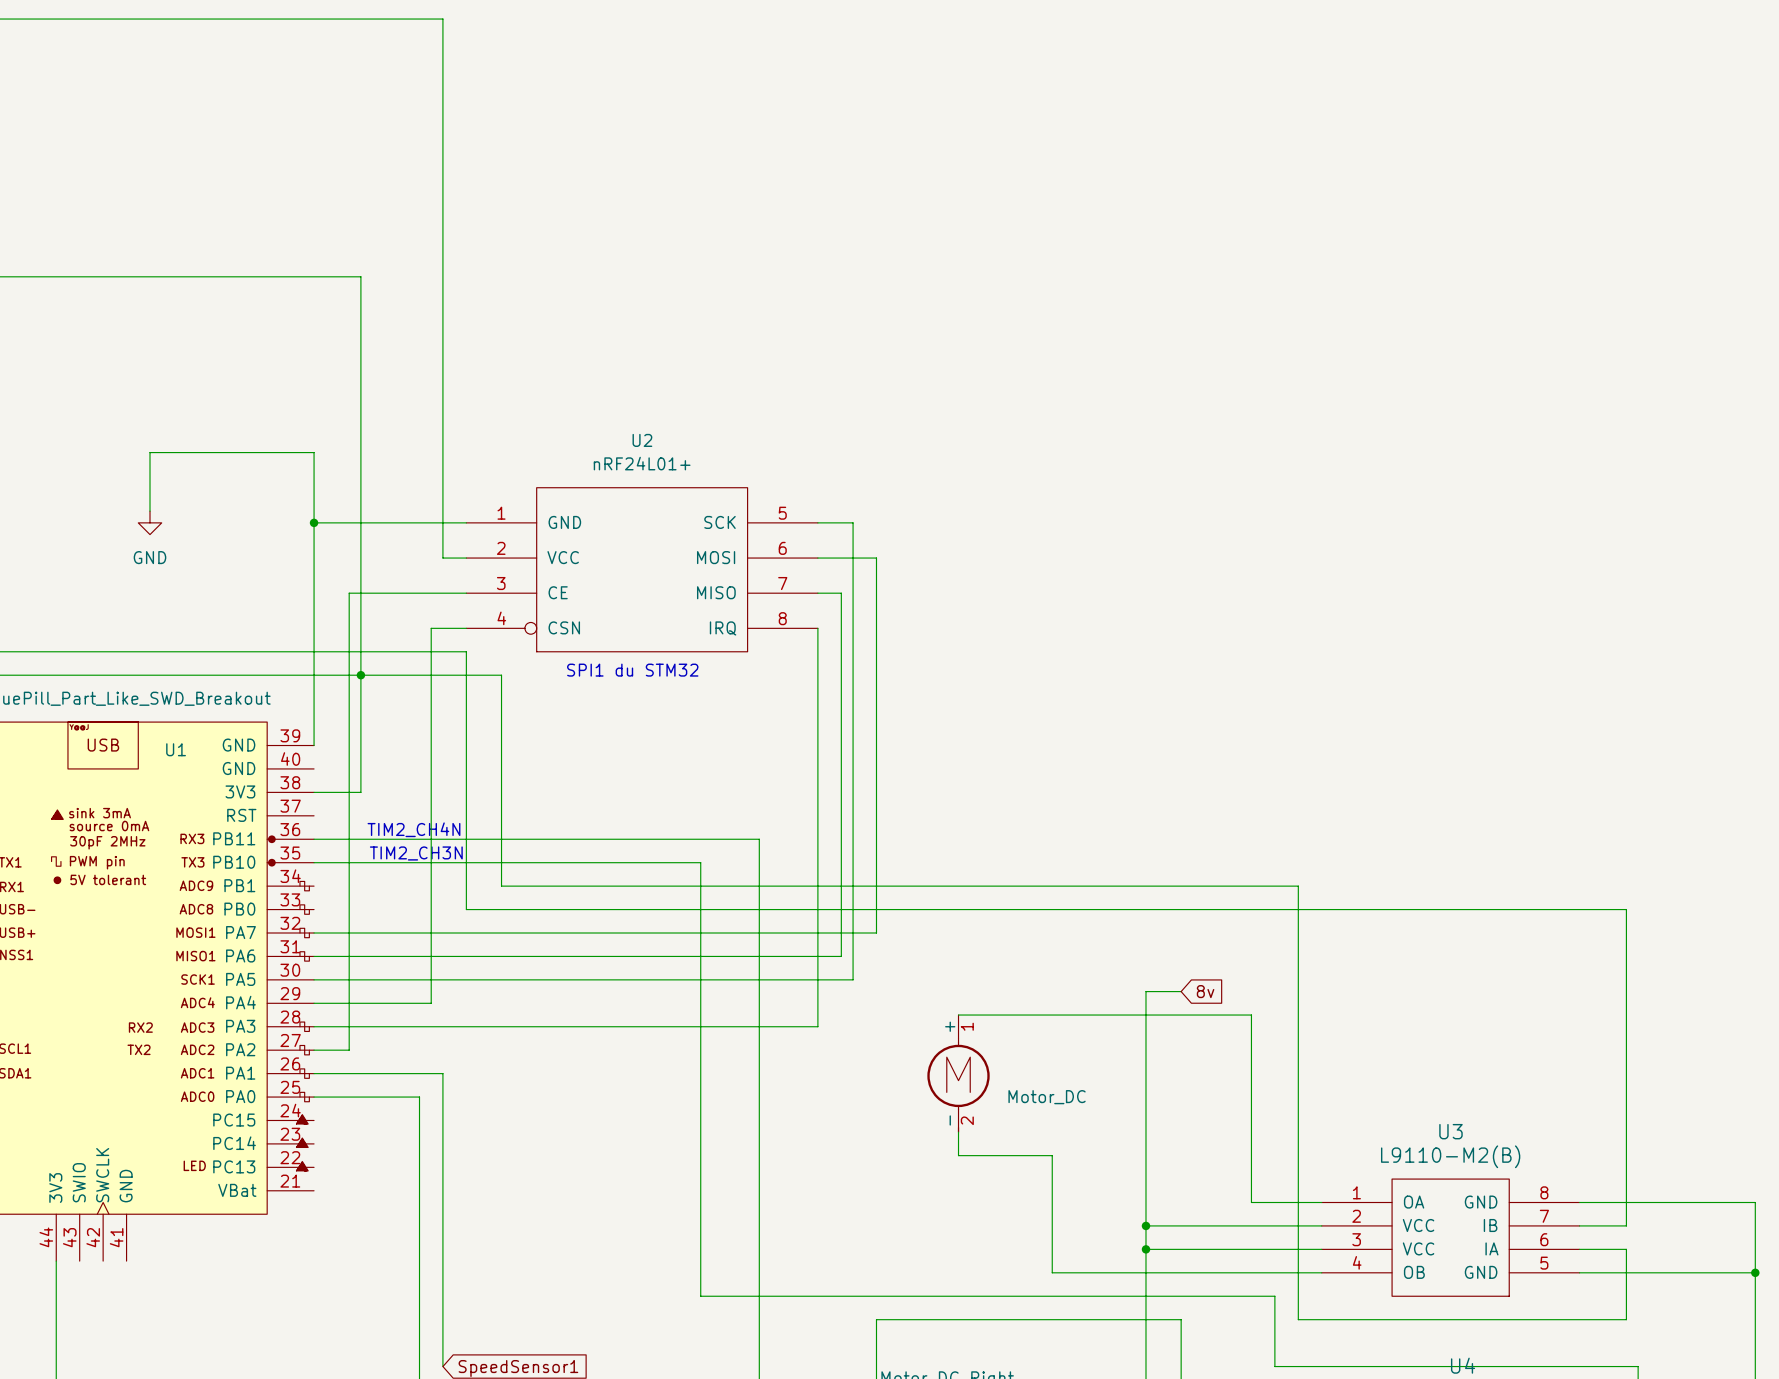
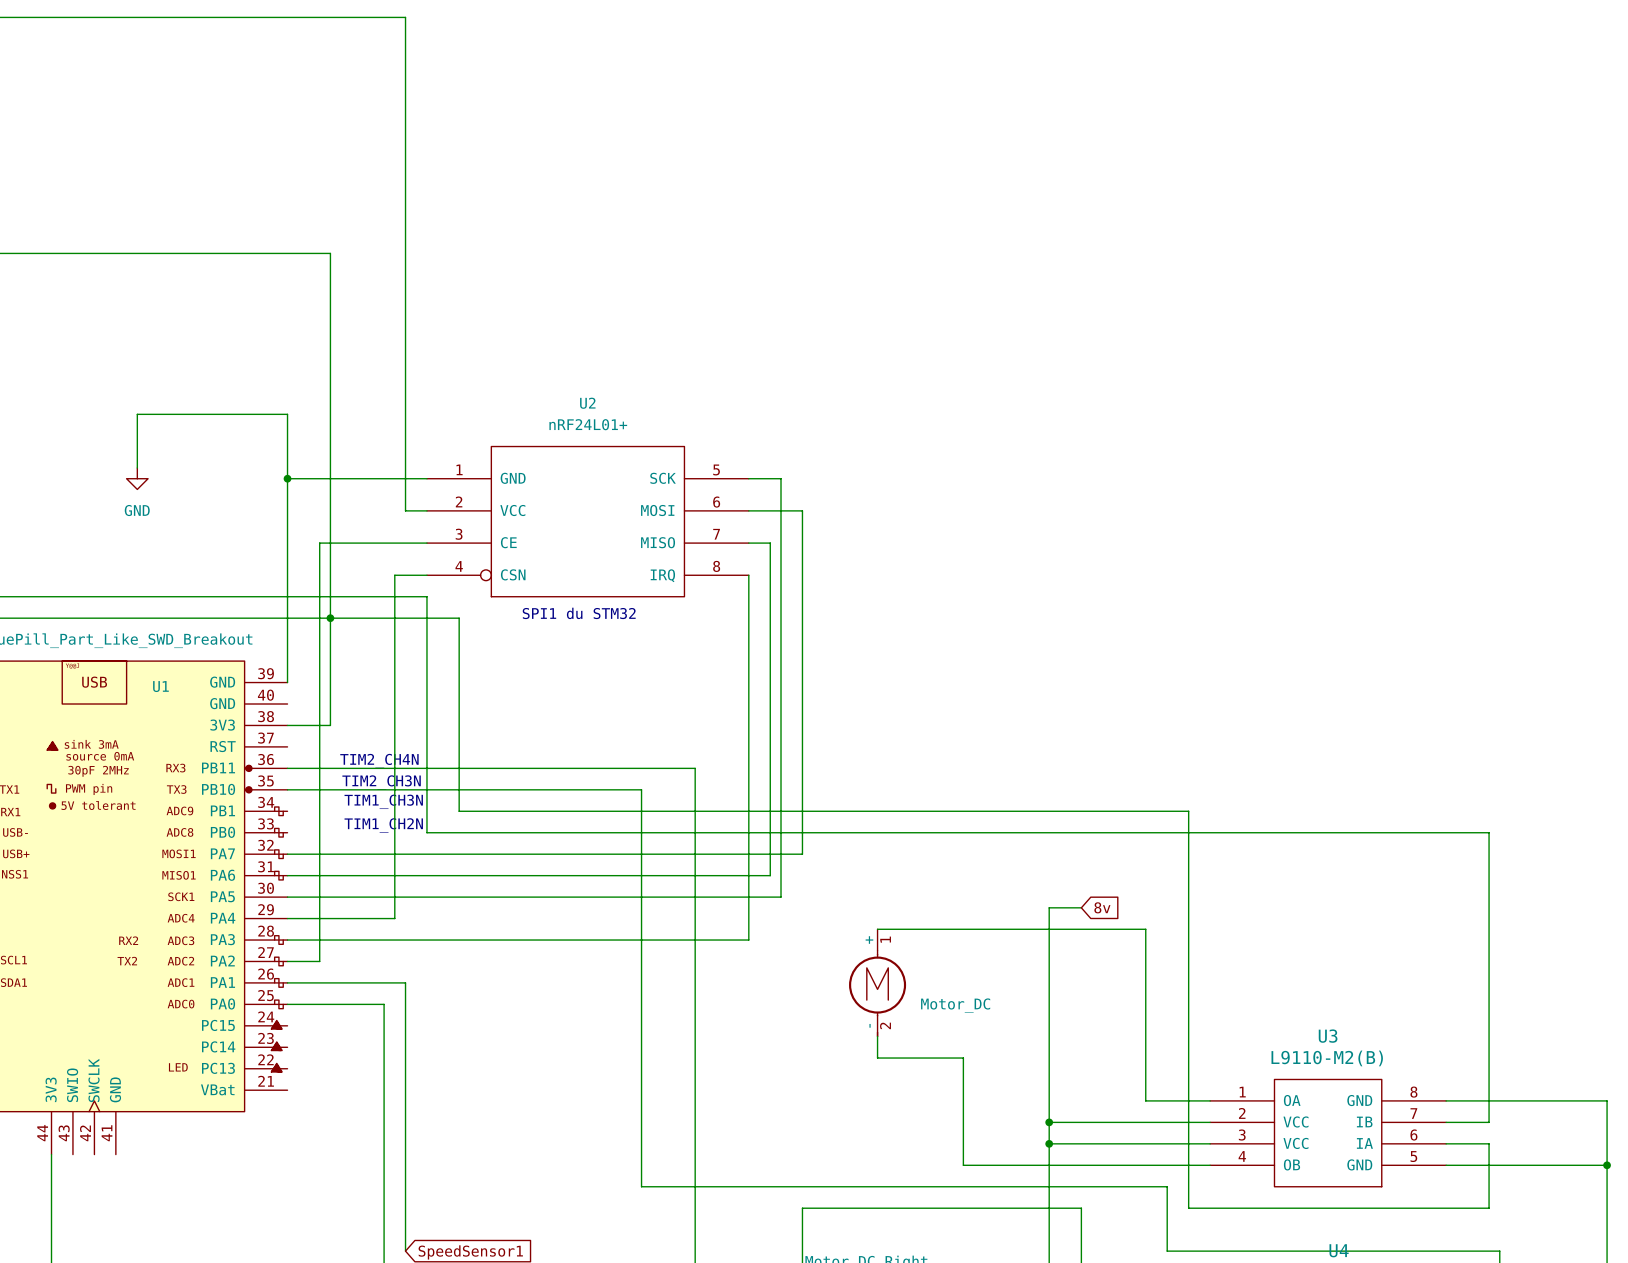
text: none -> TIM1_CH3N (383, 801)
text: none -> TIM1_CH2N (383, 825)

